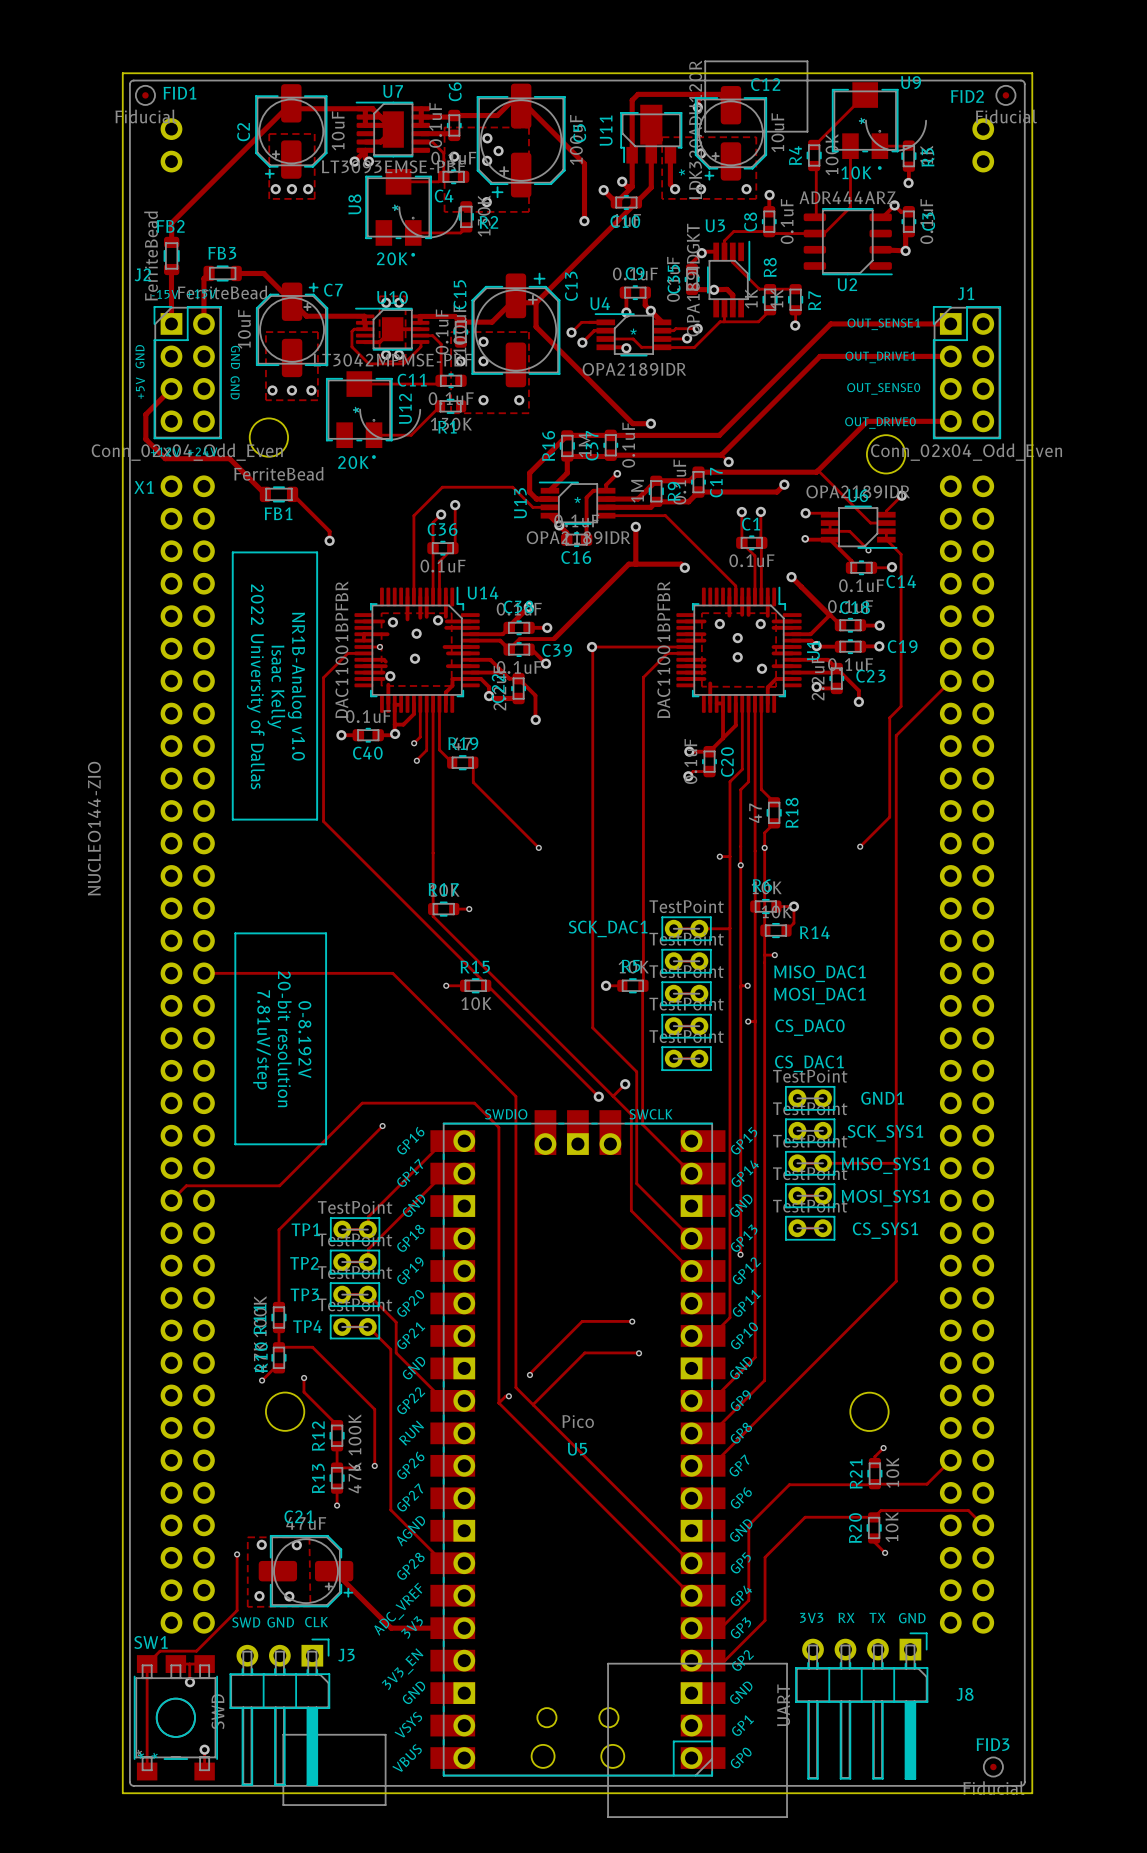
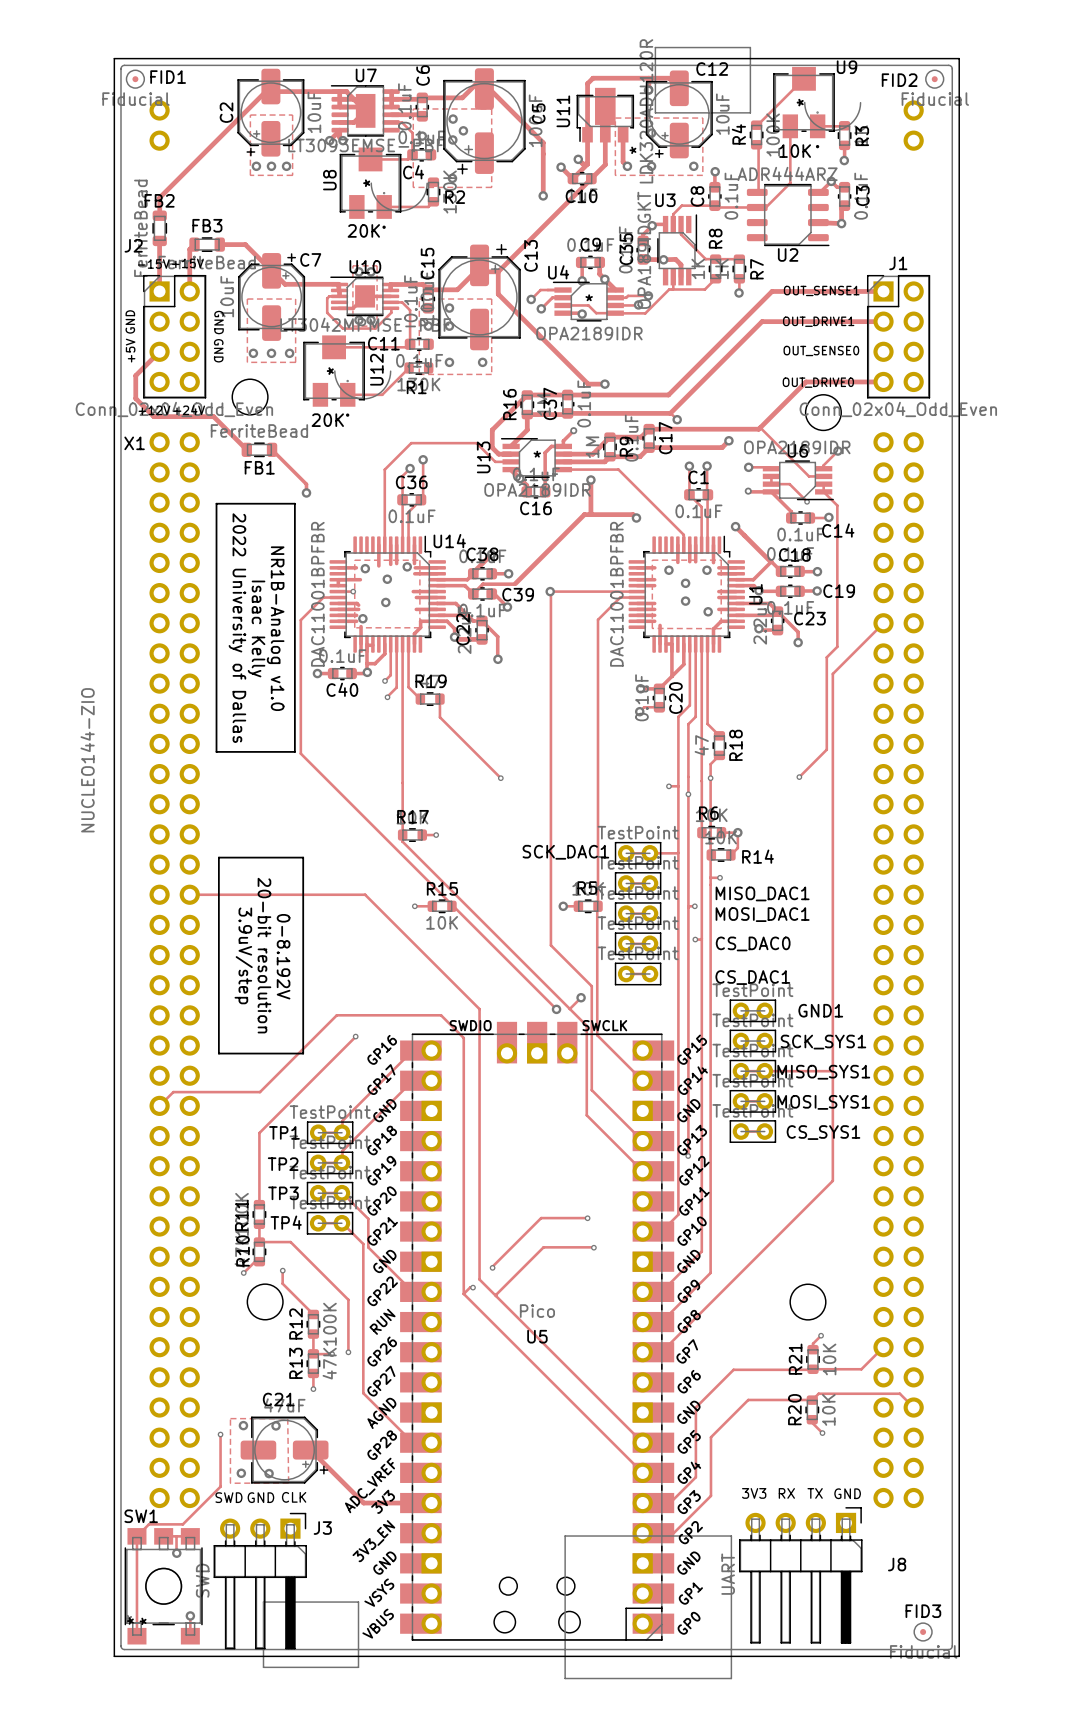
text: 7.81uV/step (262, 1039) -> 3.9uV/step (243, 955)

